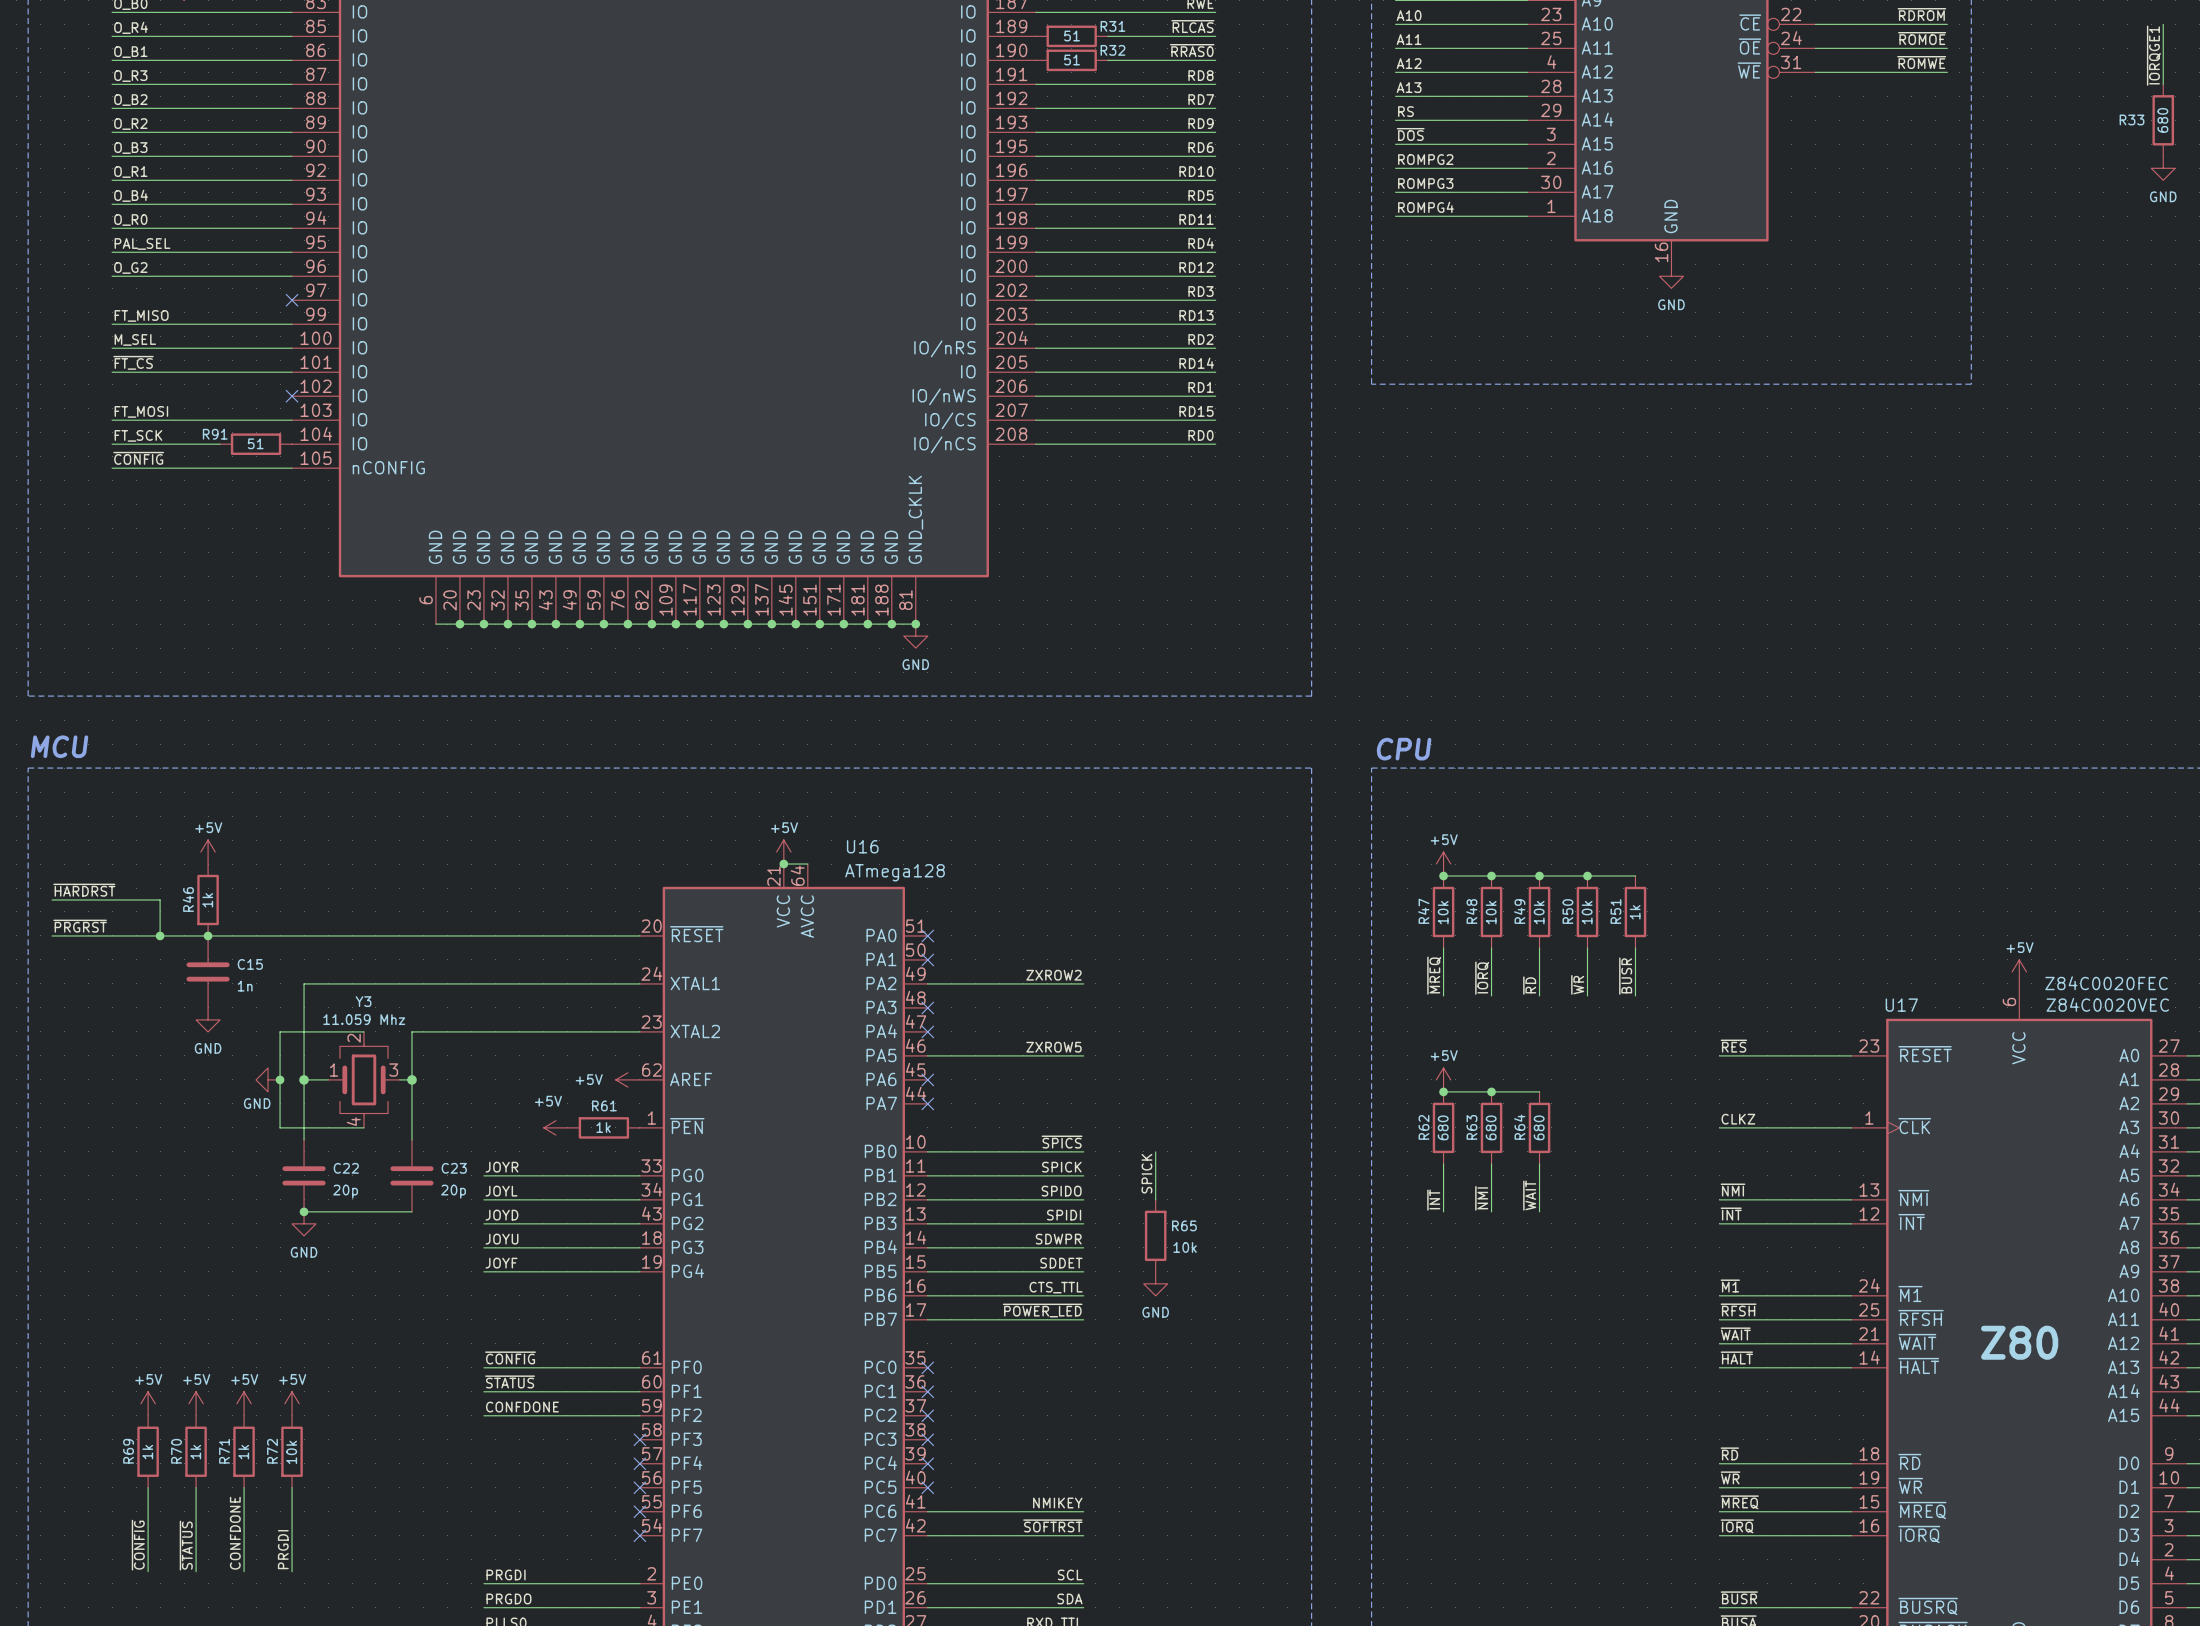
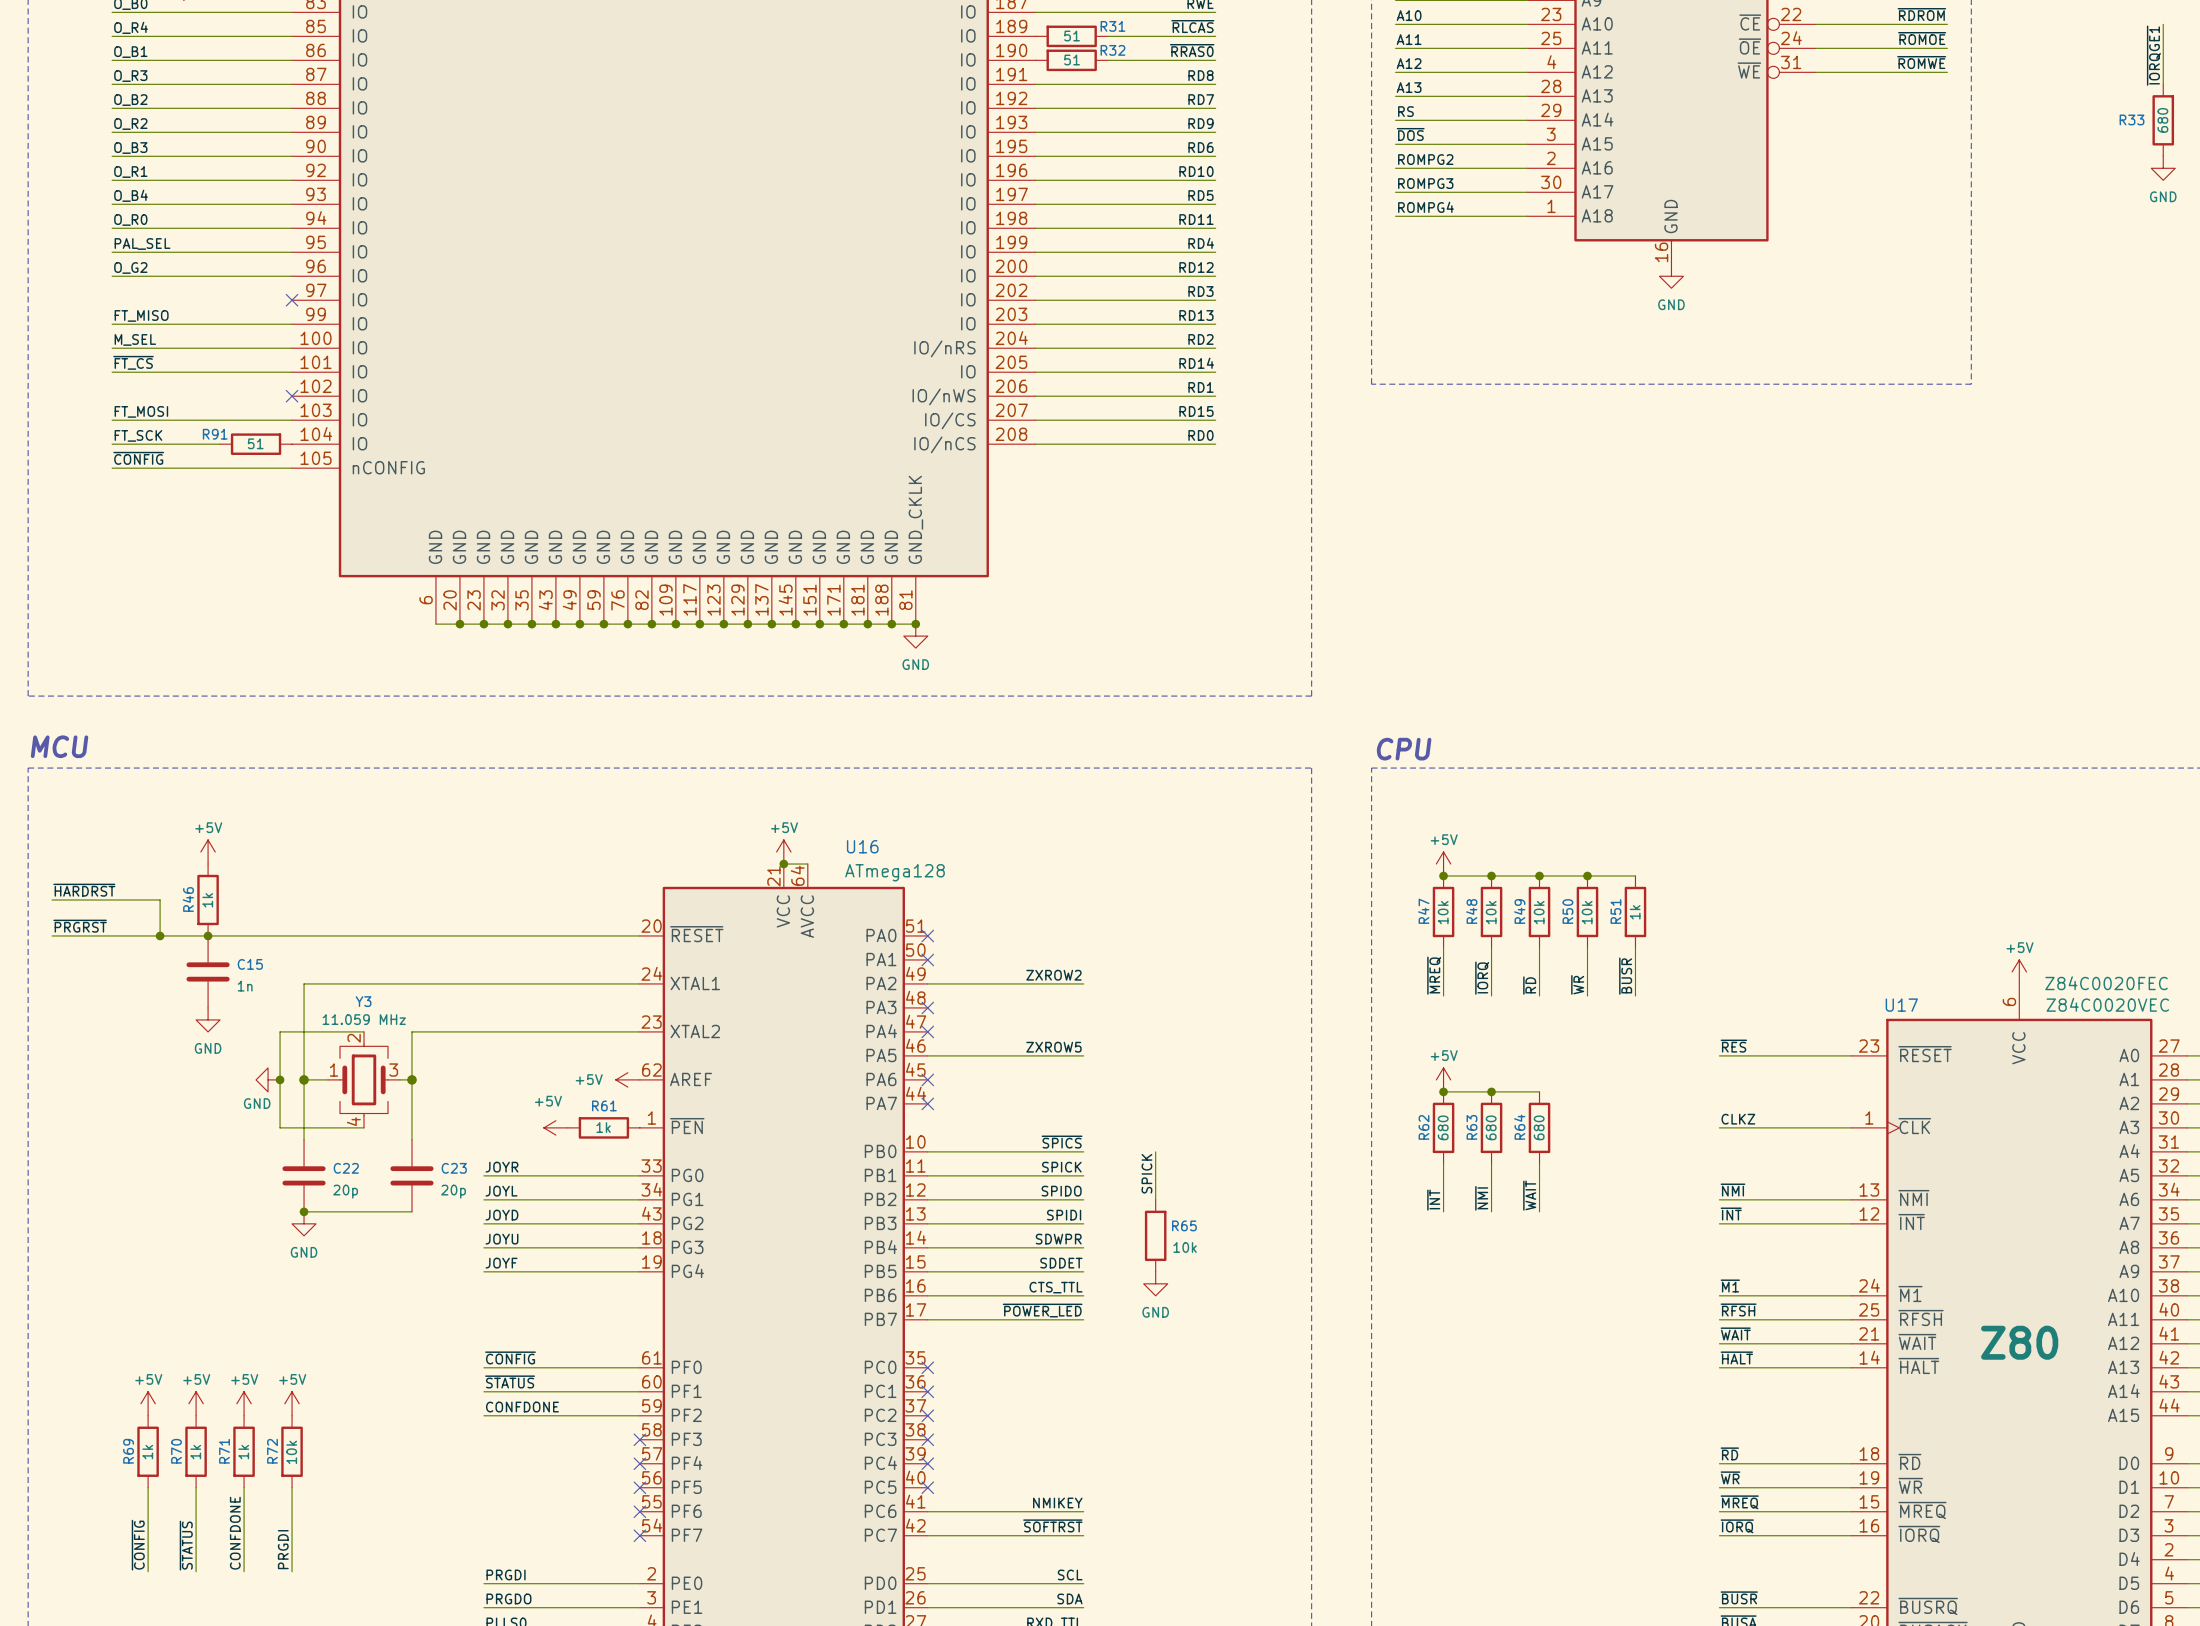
Y3 value: 11.059 Mhz (364, 1019) -> 11.059 MHz (364, 1019)

